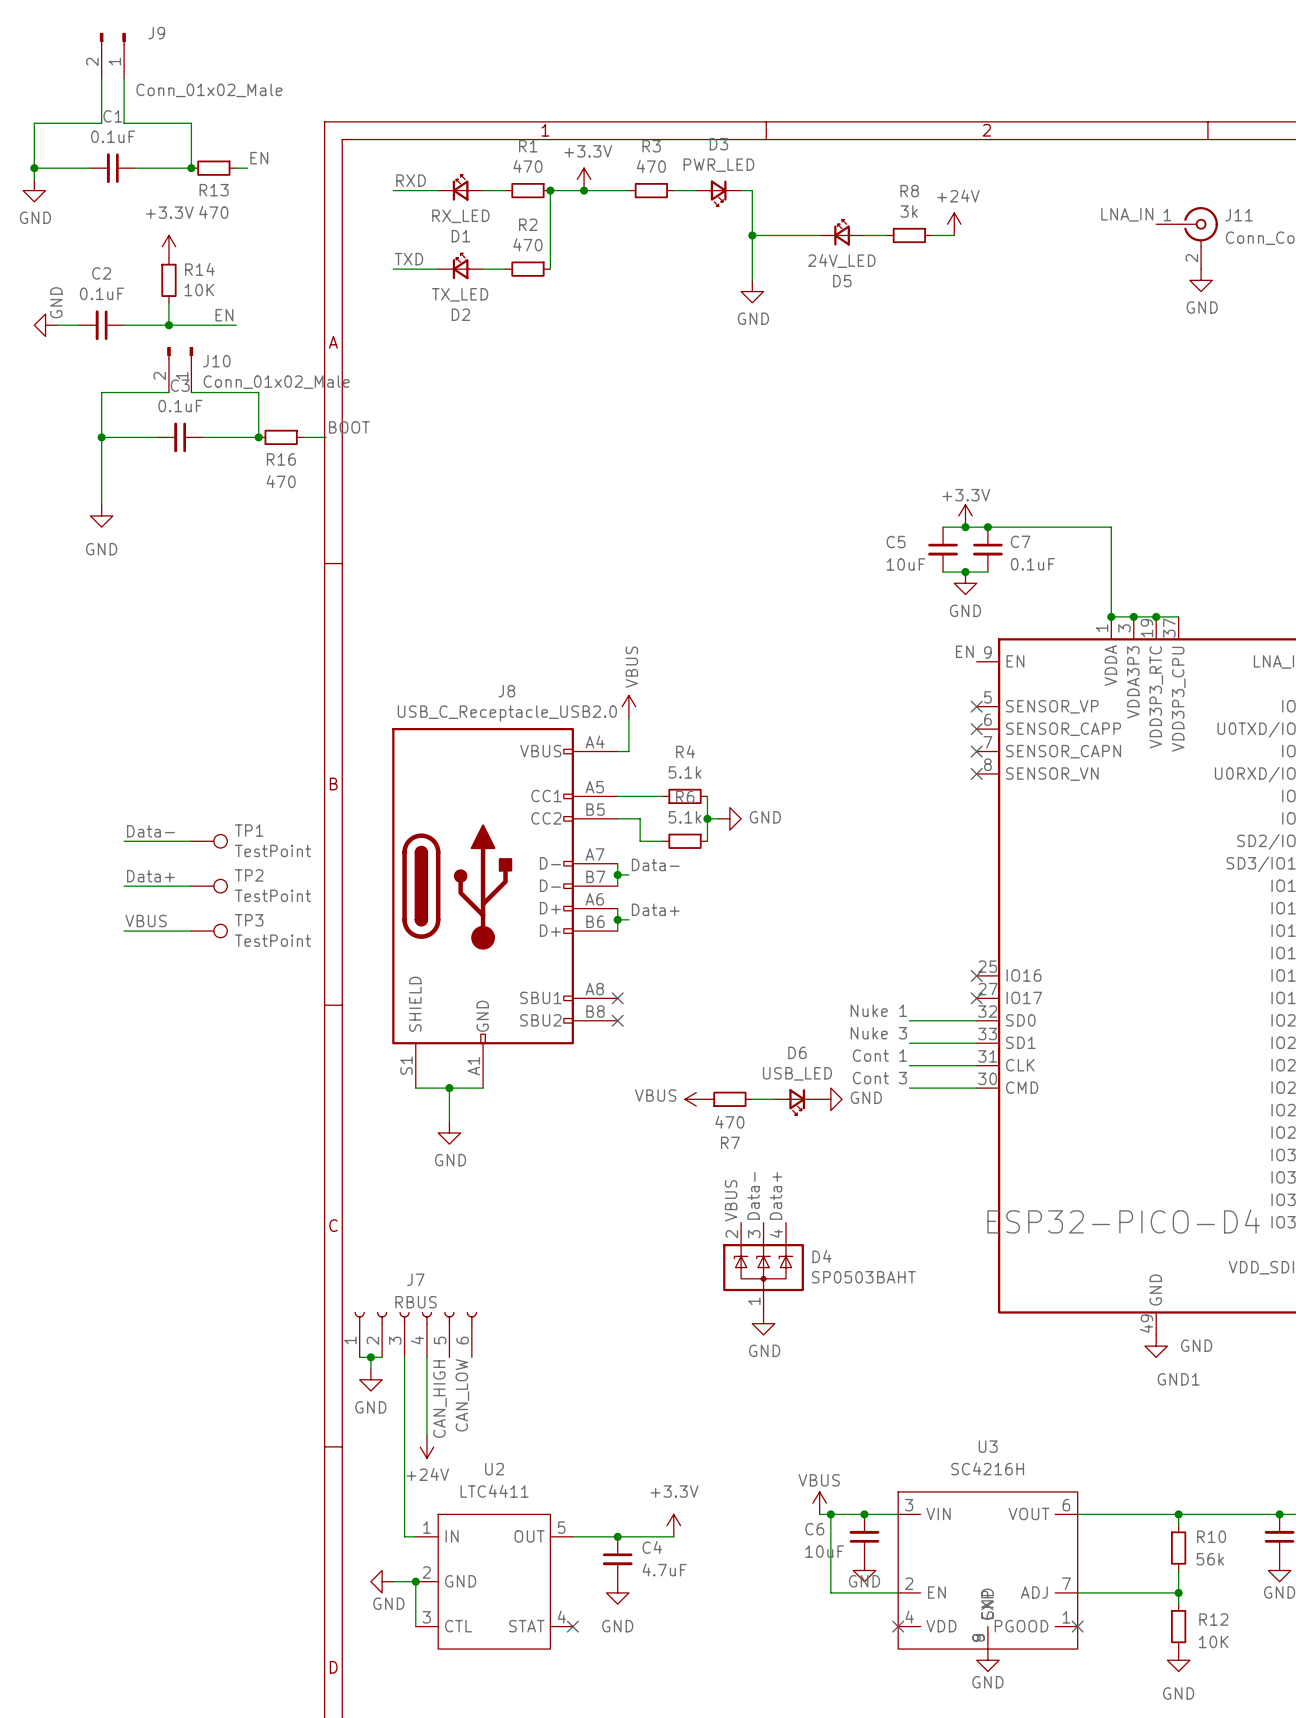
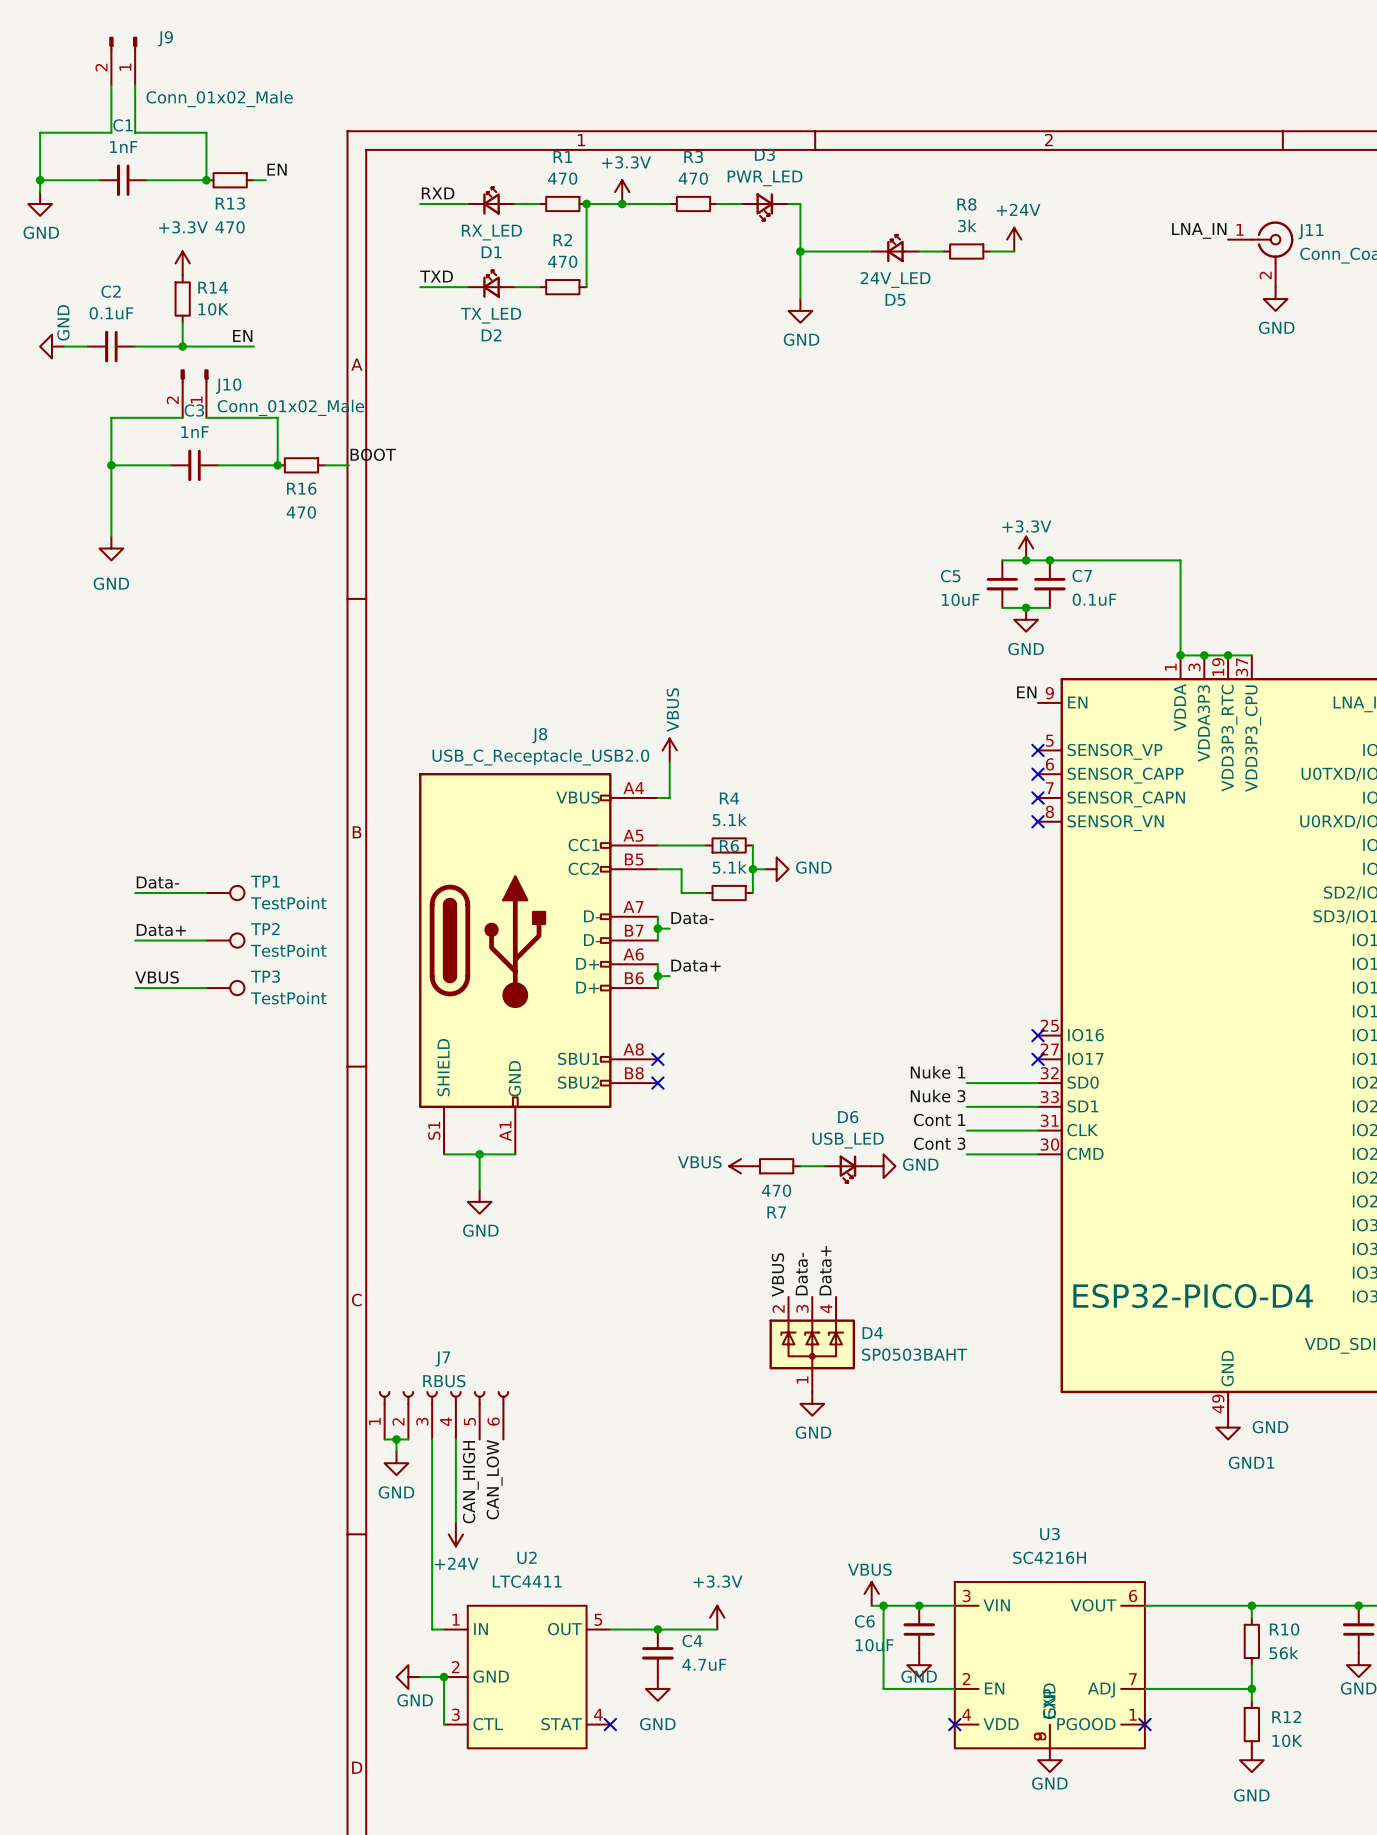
C1 value: 0.1uF (113, 136) -> 1nF (123, 147)
C3 value: 0.1uF (180, 406) -> 1nF (194, 432)

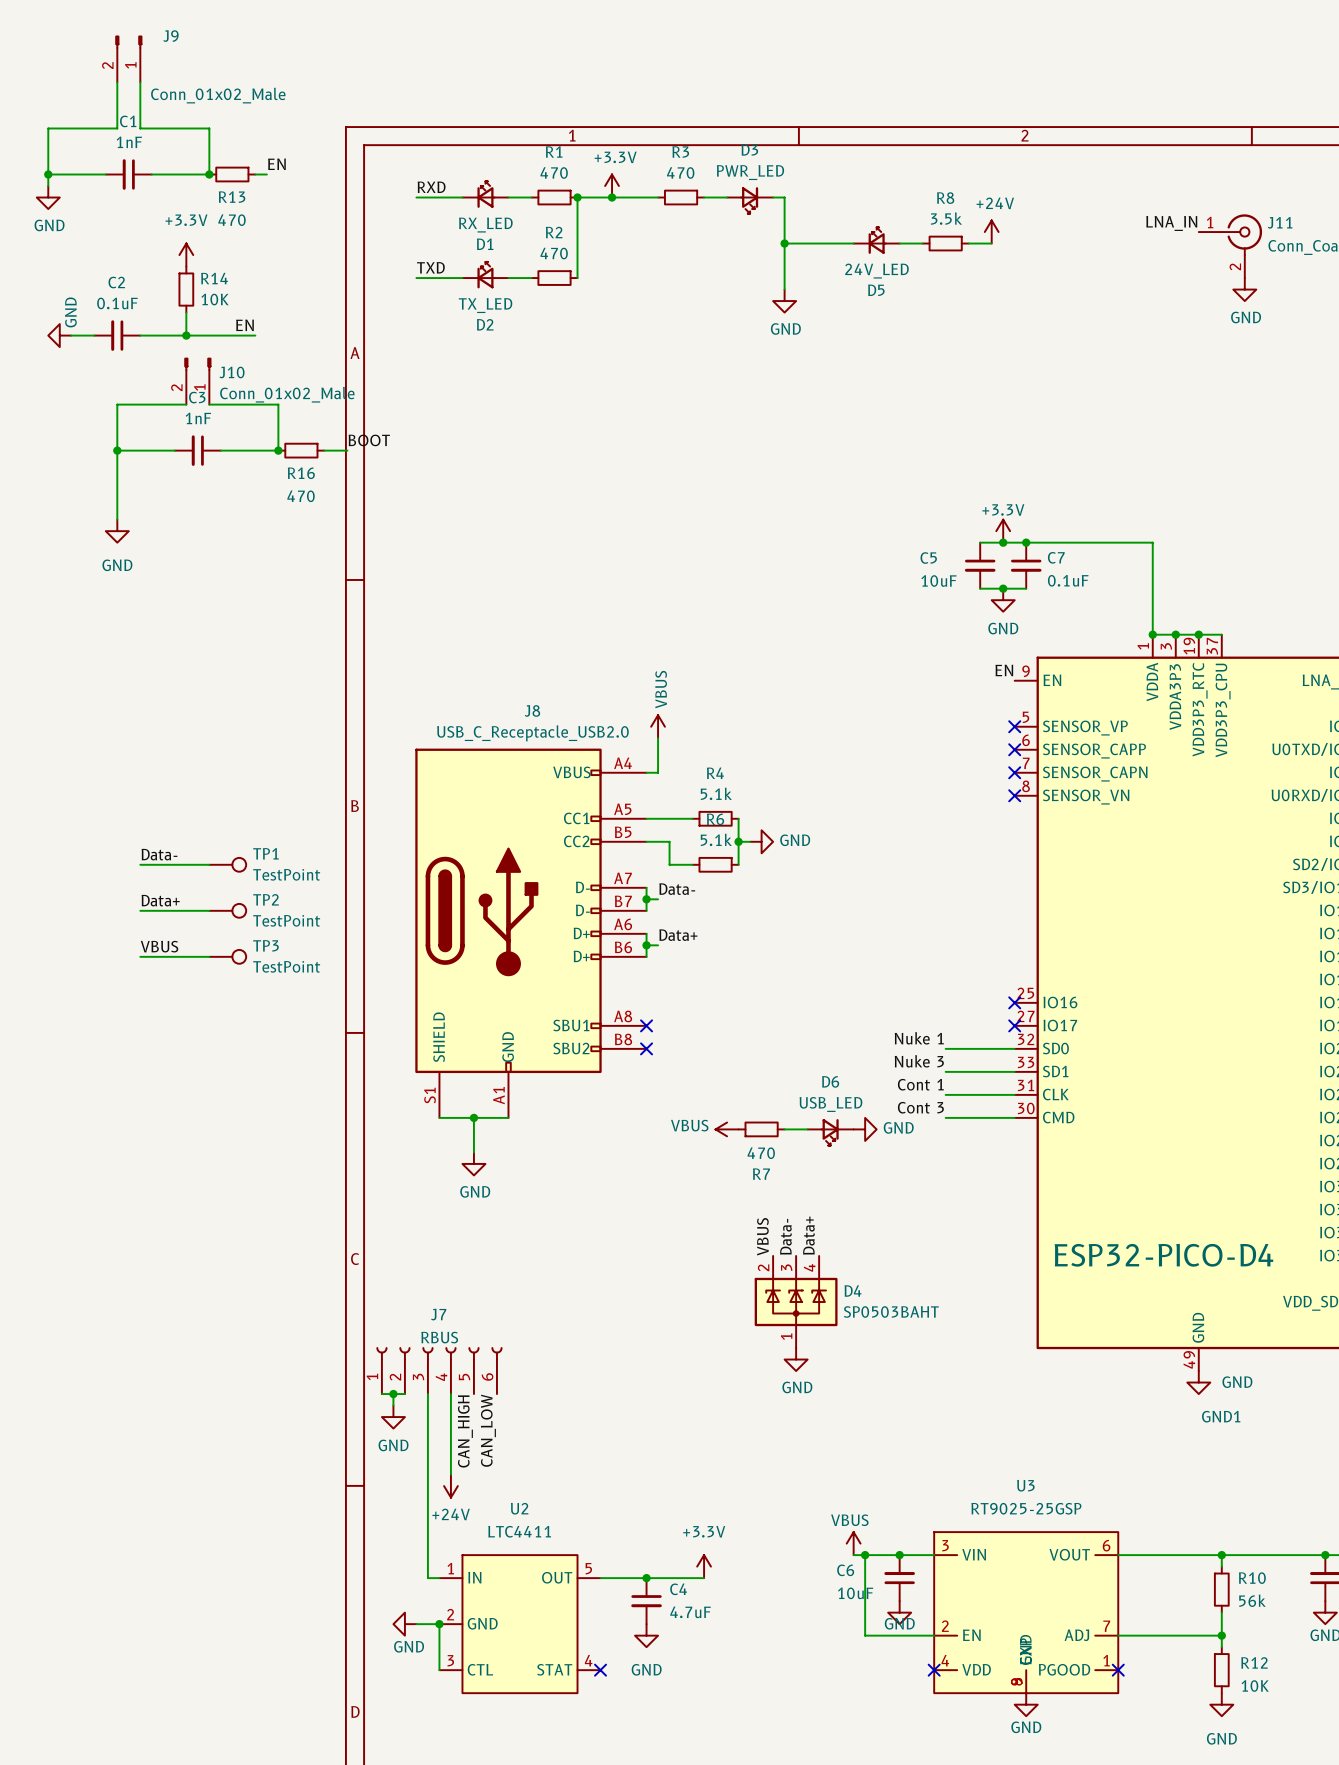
R8 value: 3k (967, 225) -> 3.5k (946, 218)
U3 value: SC4216H (1049, 1557) -> RT9025-25GSP (1026, 1508)

